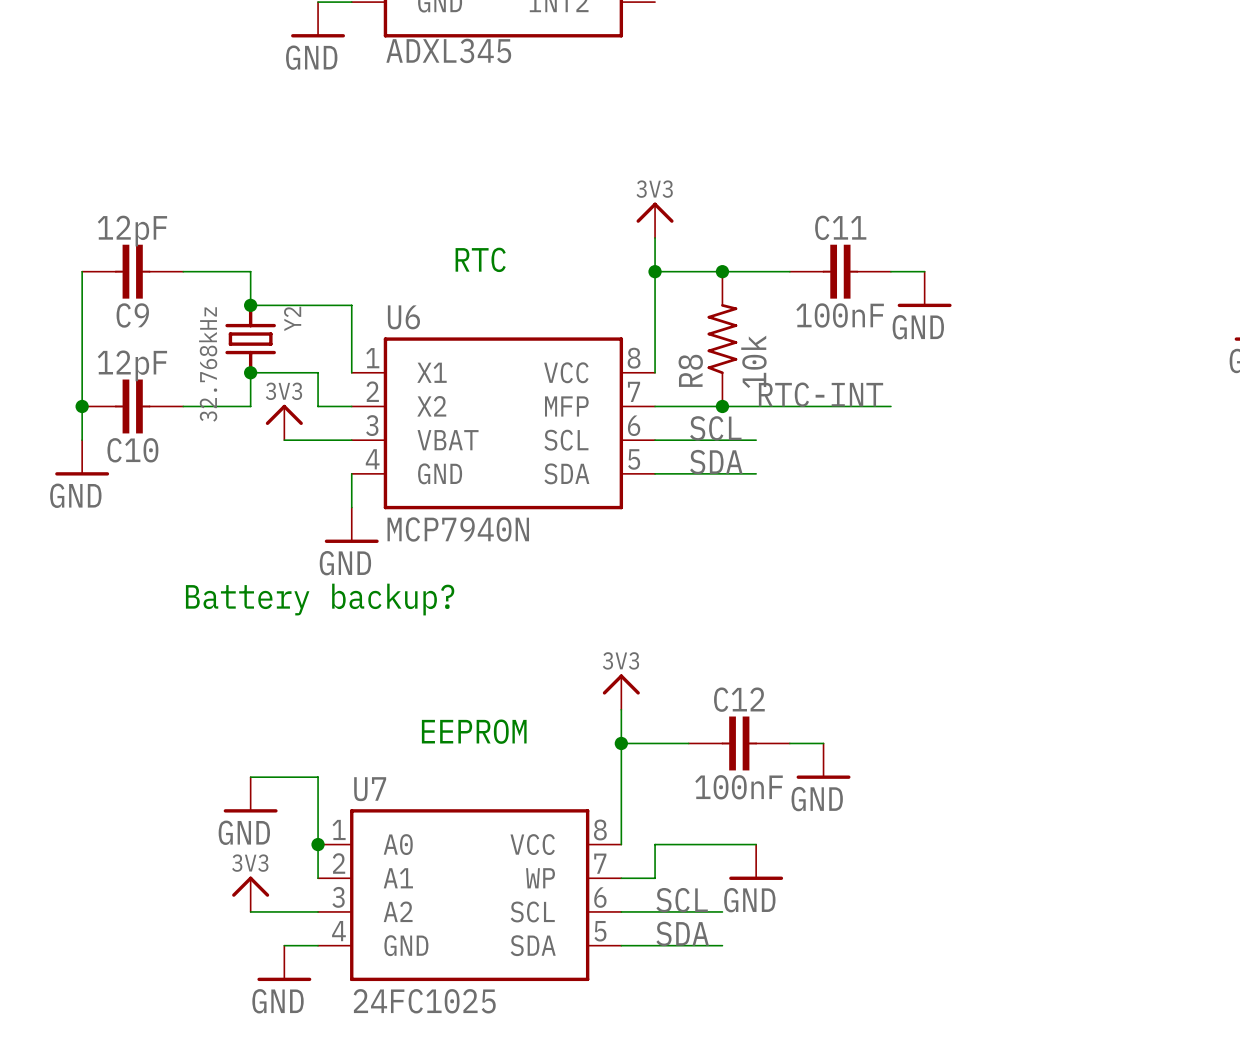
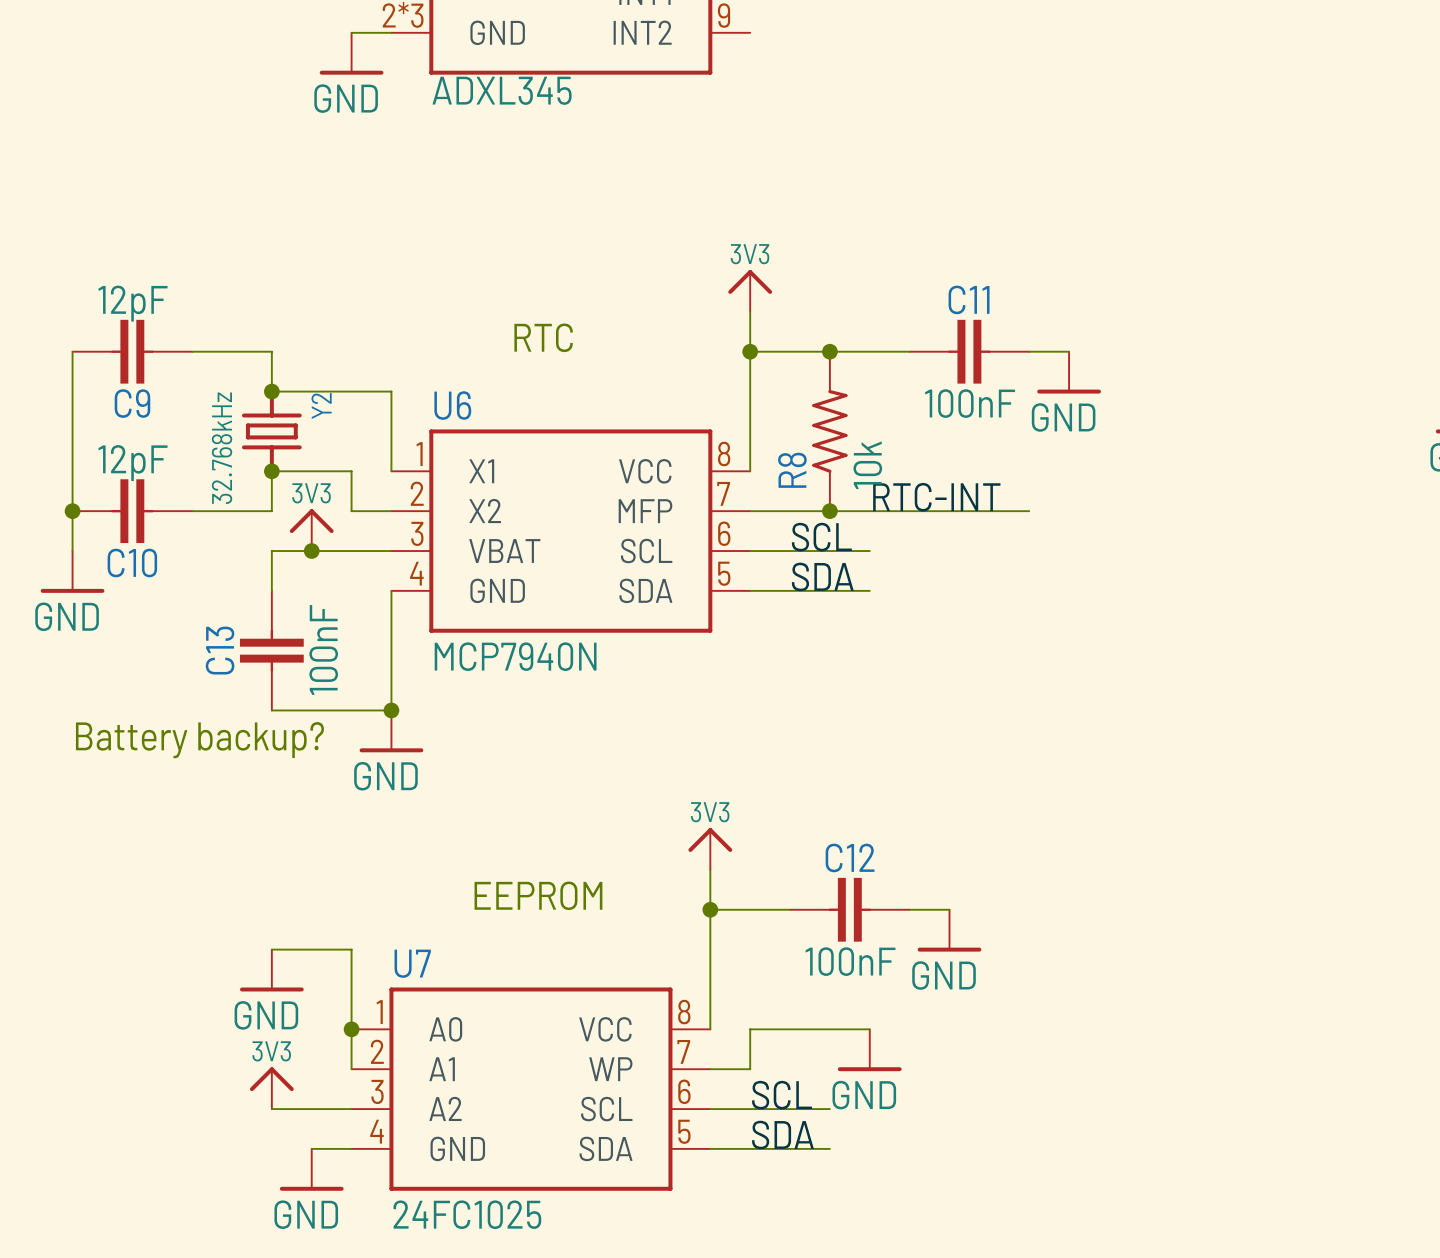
wire: none -> (311, 551) (271, 551) (271, 590)
junction: none -> (311, 551)
wire: none -> (391, 630) (391, 710) (271, 710)
C13: none -> 100nF (271, 650)
power symbol position: GND (351, 525) -> GND (391, 731)
junction: none -> (391, 710)
text position: Battery backup? (320, 599) -> Battery backup? (199, 740)

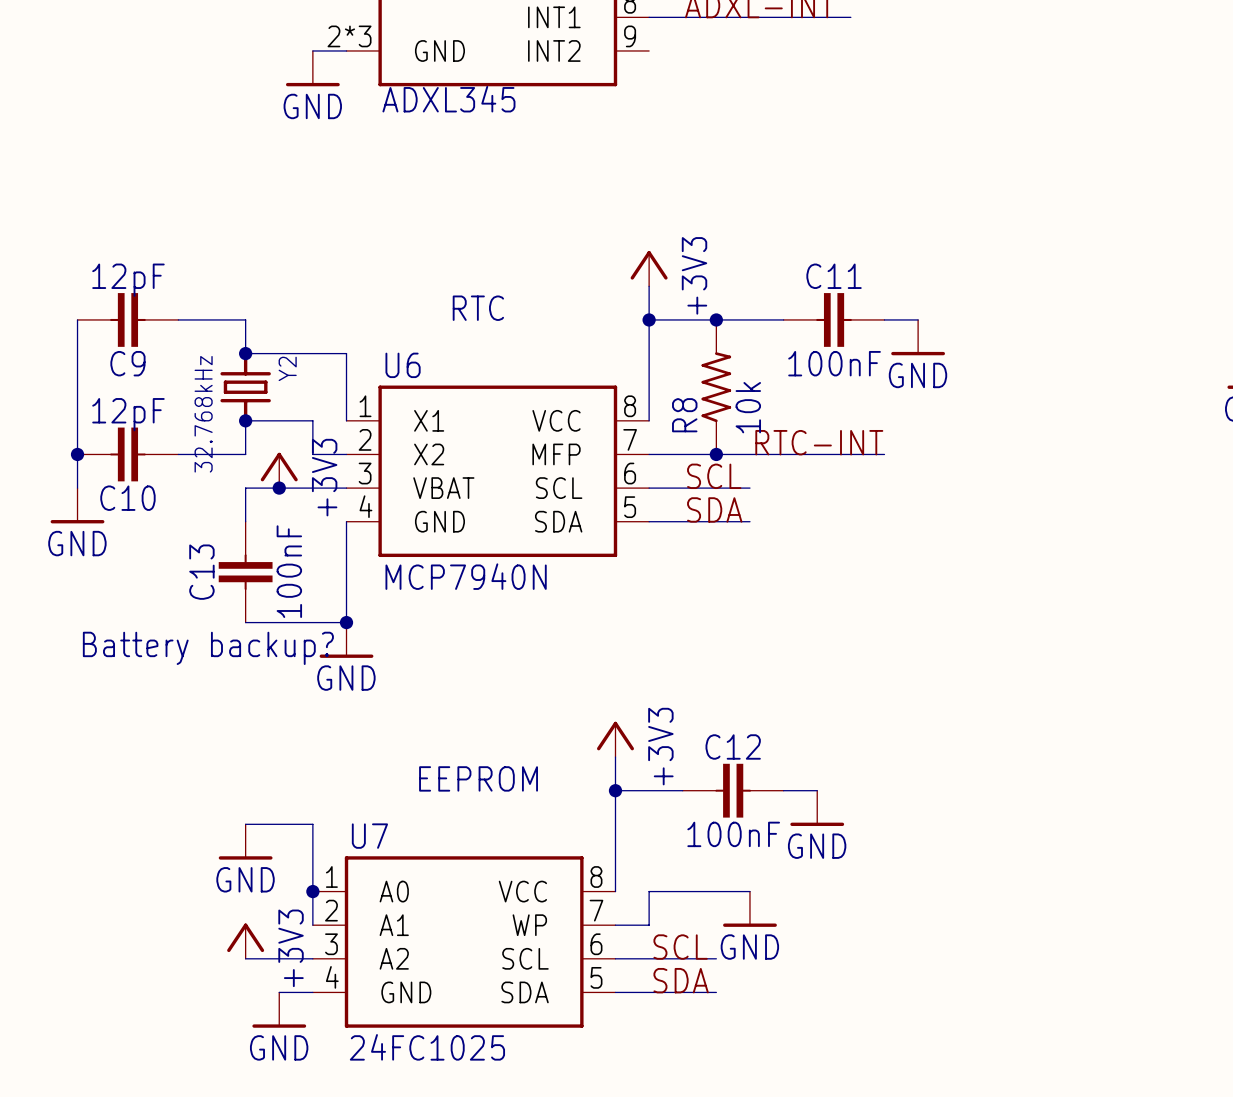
power symbol: 3V3 (750, 290) -> +3V3 (649, 268)
power symbol: 3V3 (311, 530) -> +3V3 (279, 470)
power symbol: 3V3 (710, 848) -> +3V3 (615, 739)
power symbol: 3V3 (271, 1088) -> +3V3 (245, 941)

